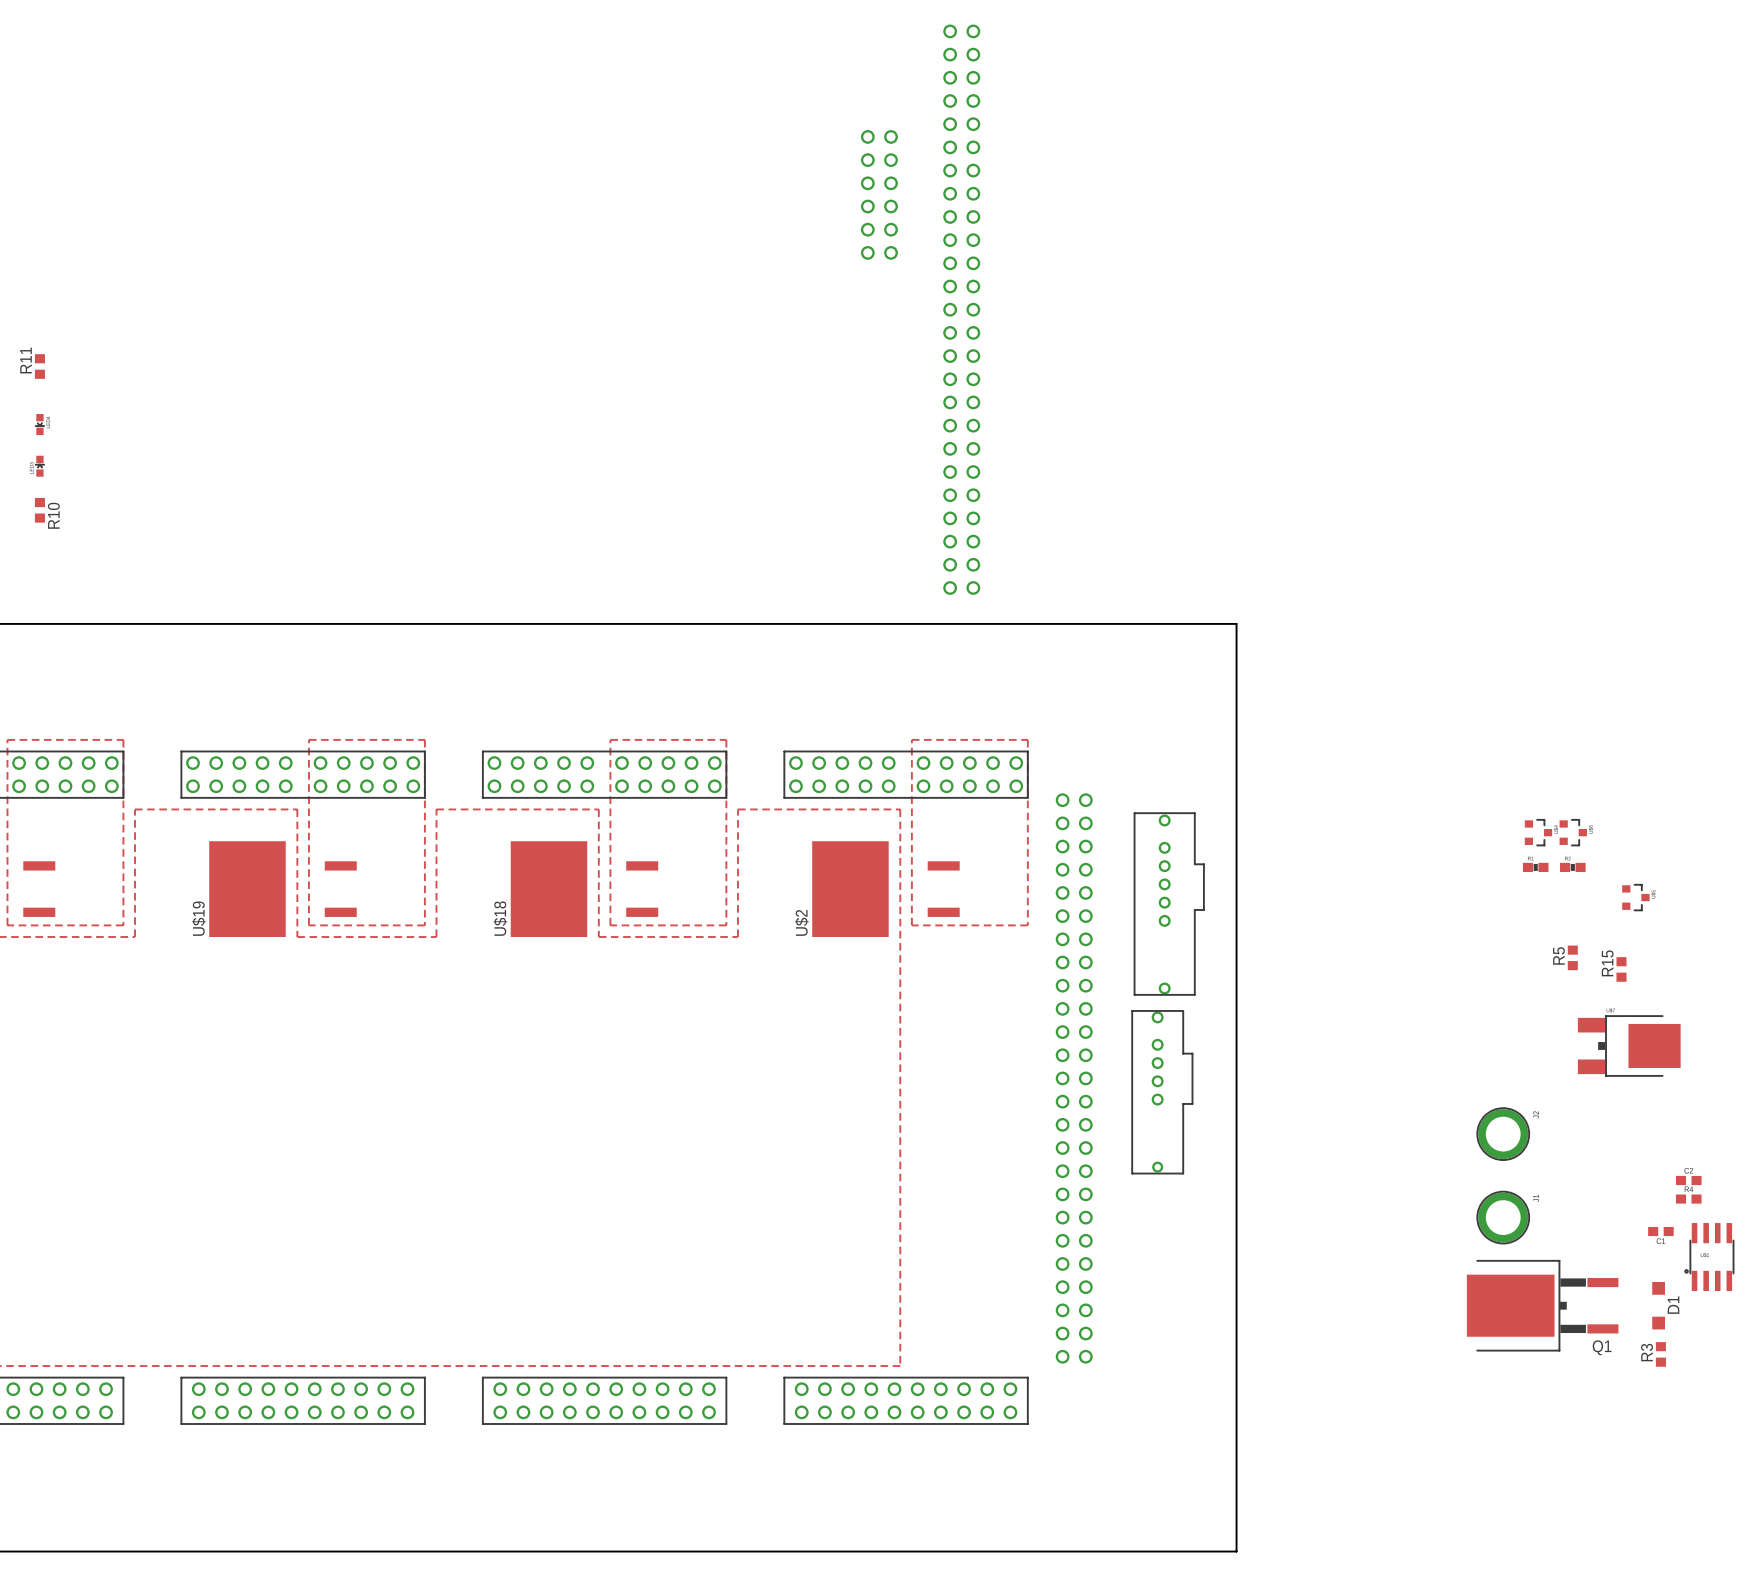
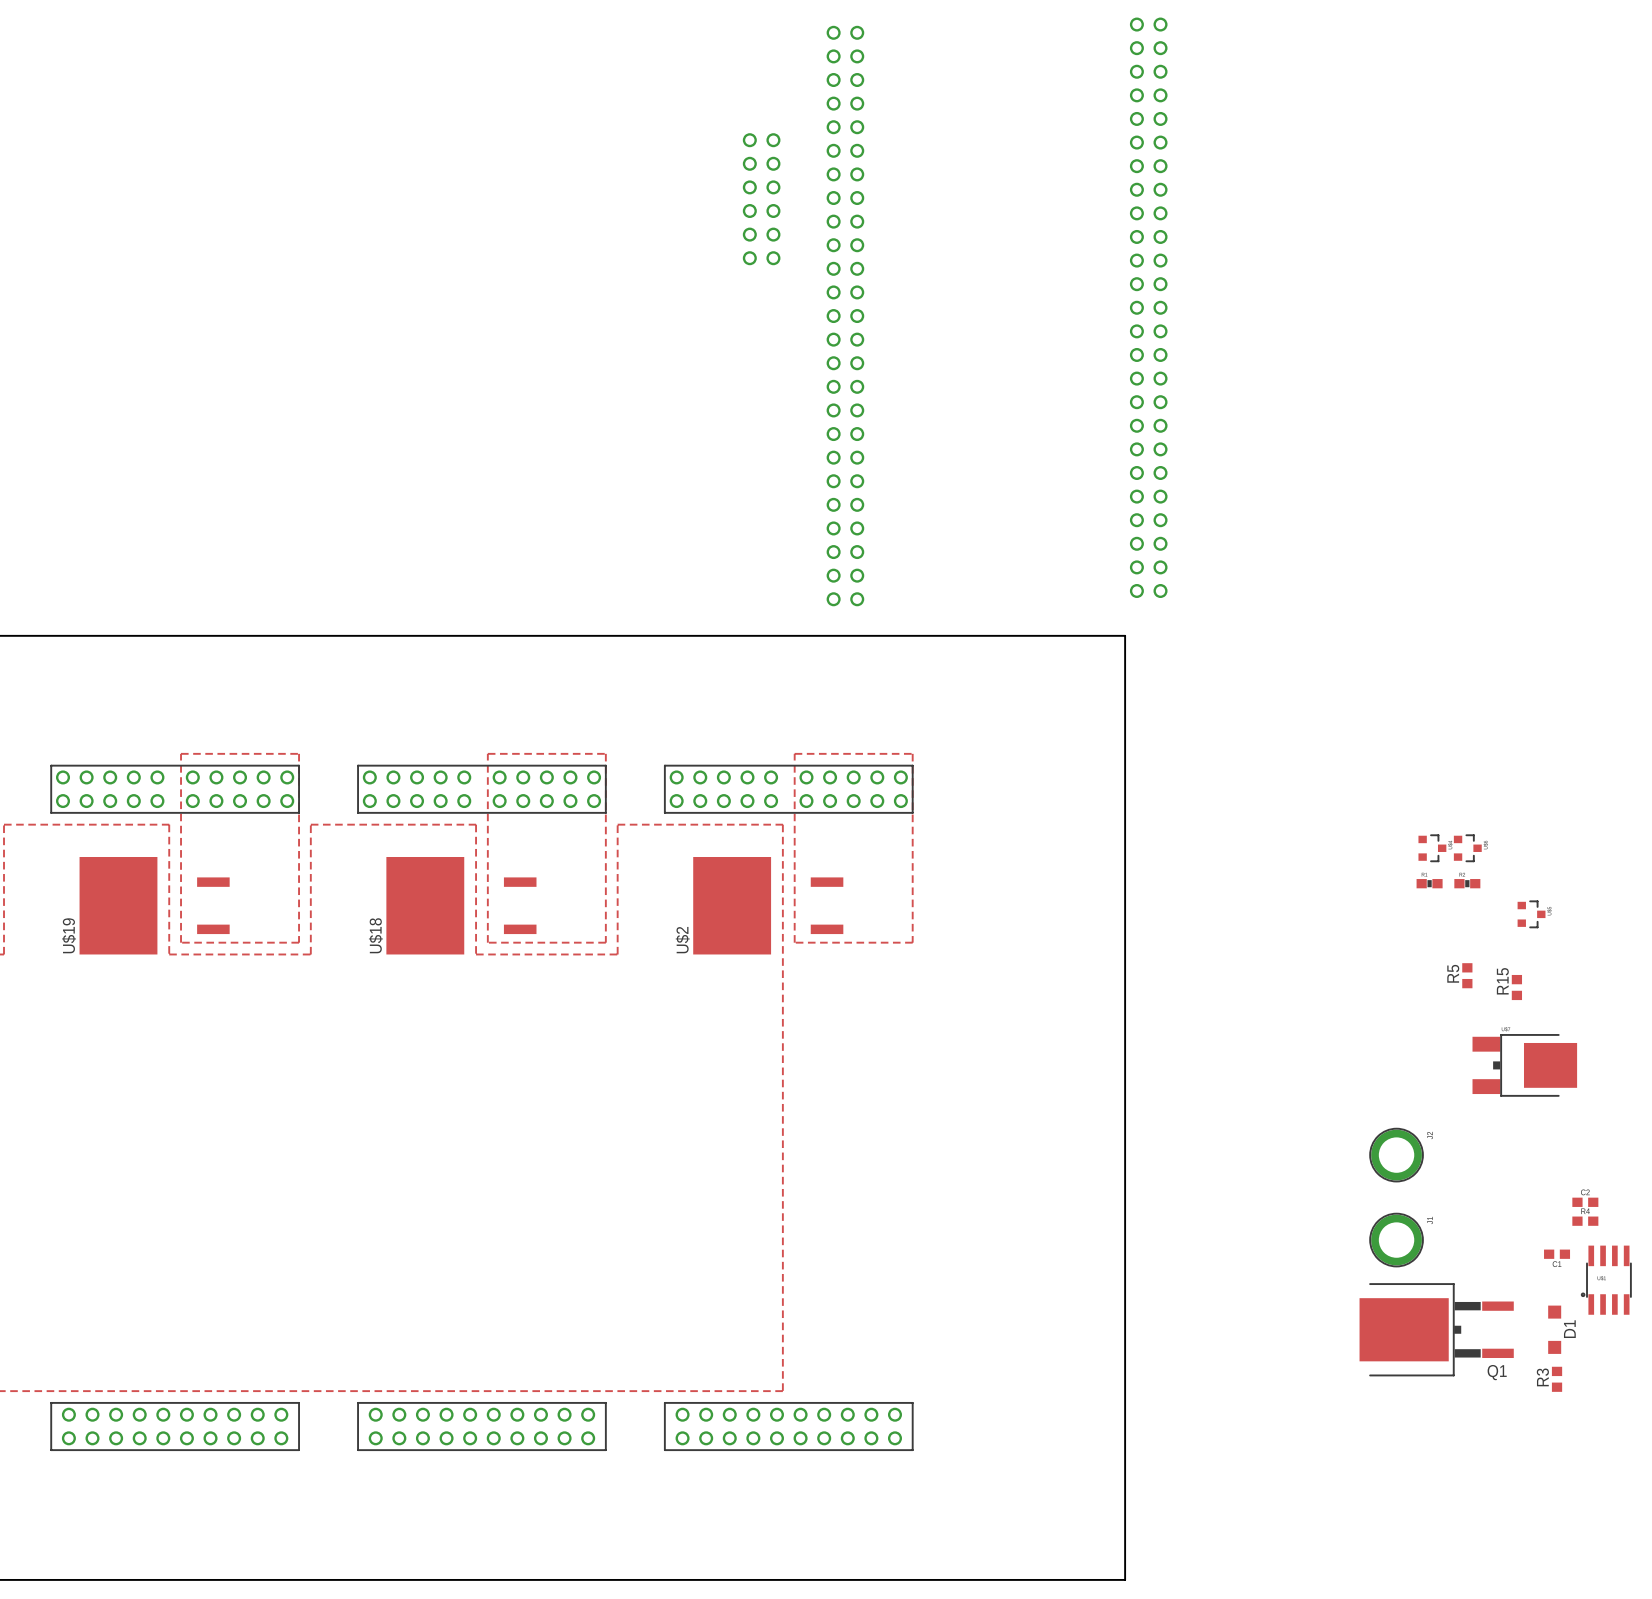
part: none -> (1148, 307)
part: (1169, 904) -> none
part: (1074, 1078) -> none
part: (1162, 1092) -> none

